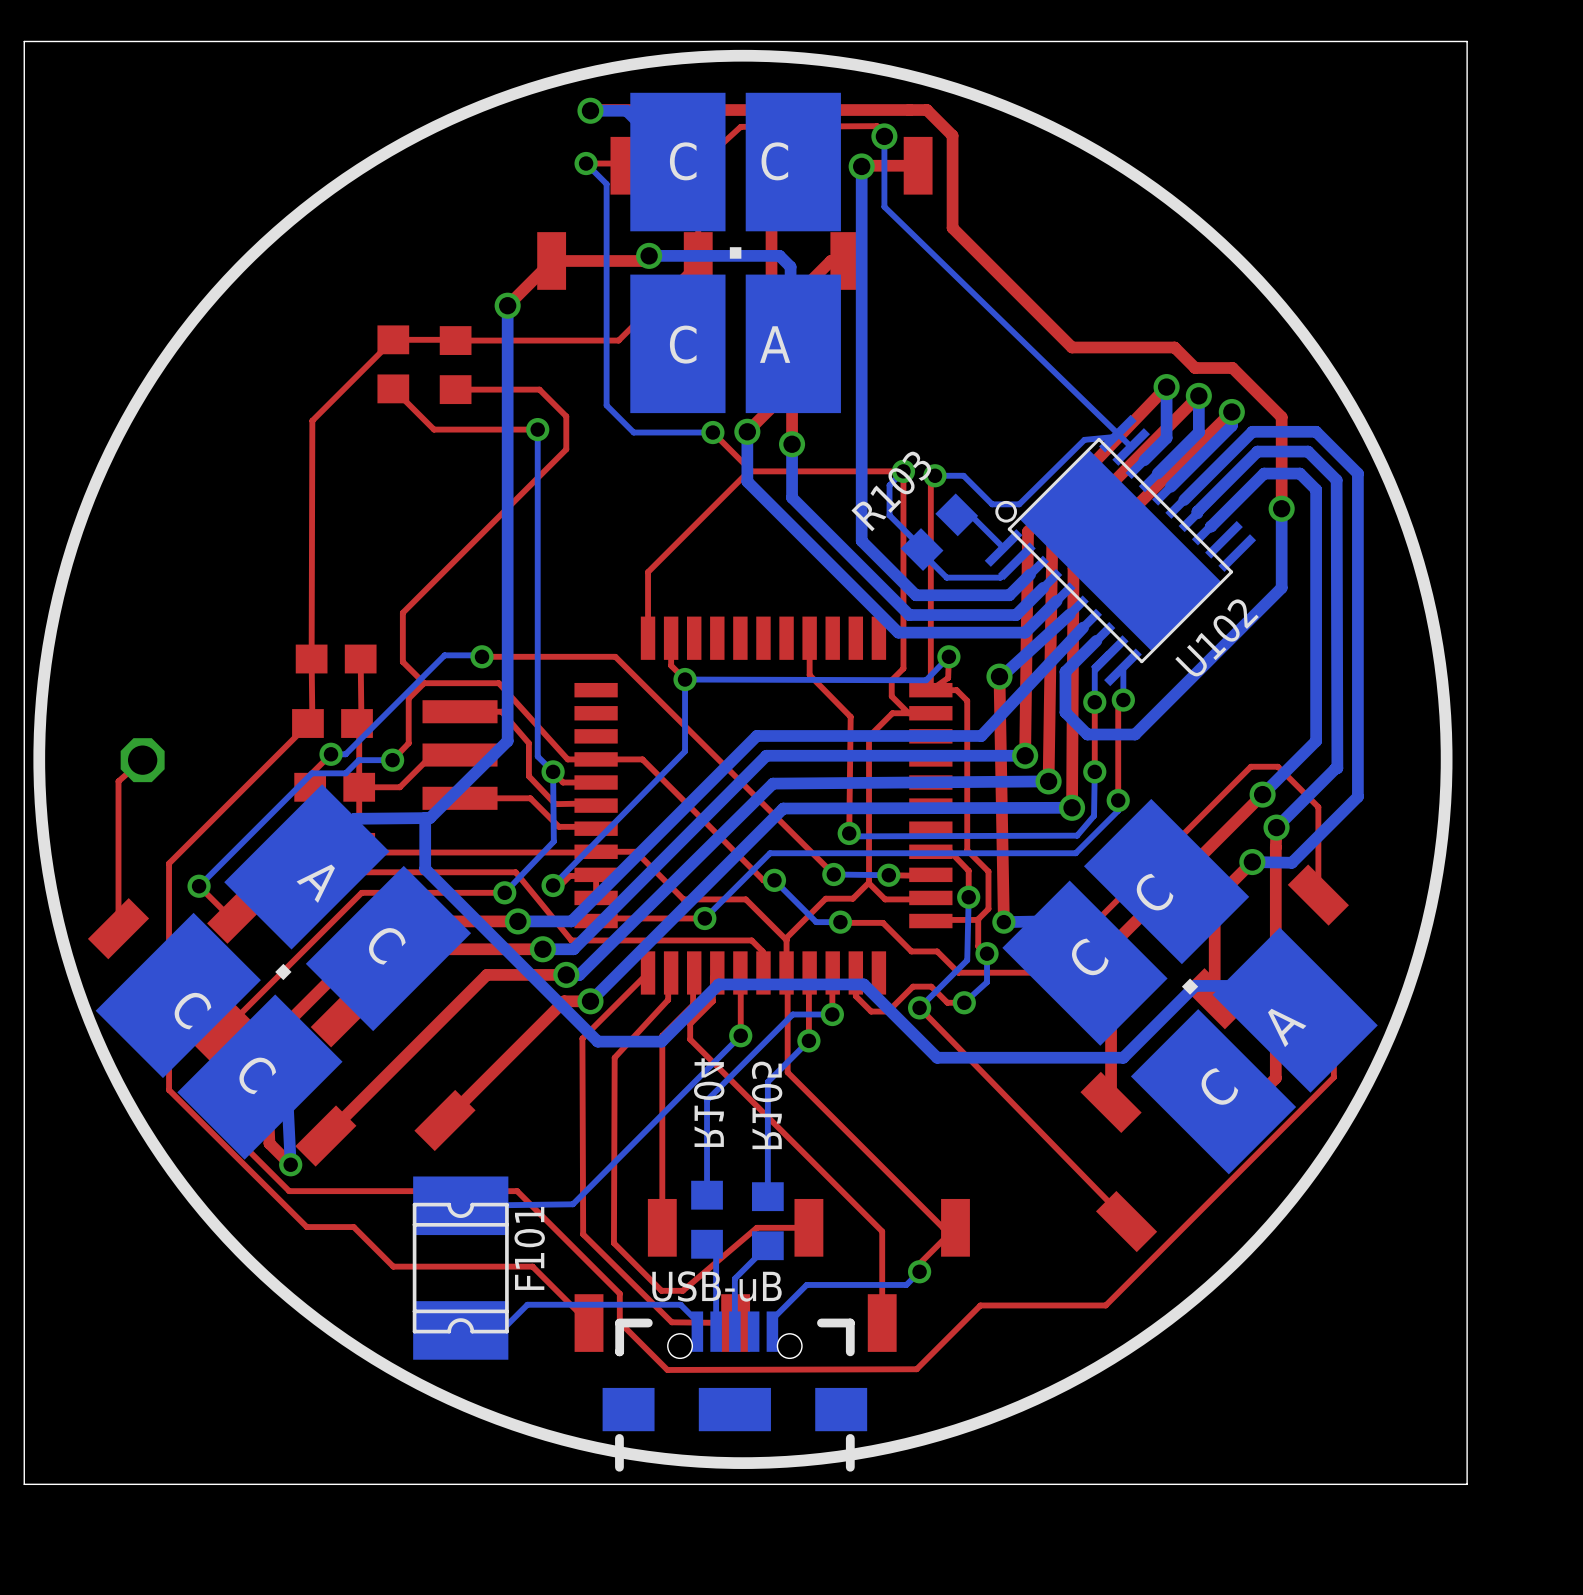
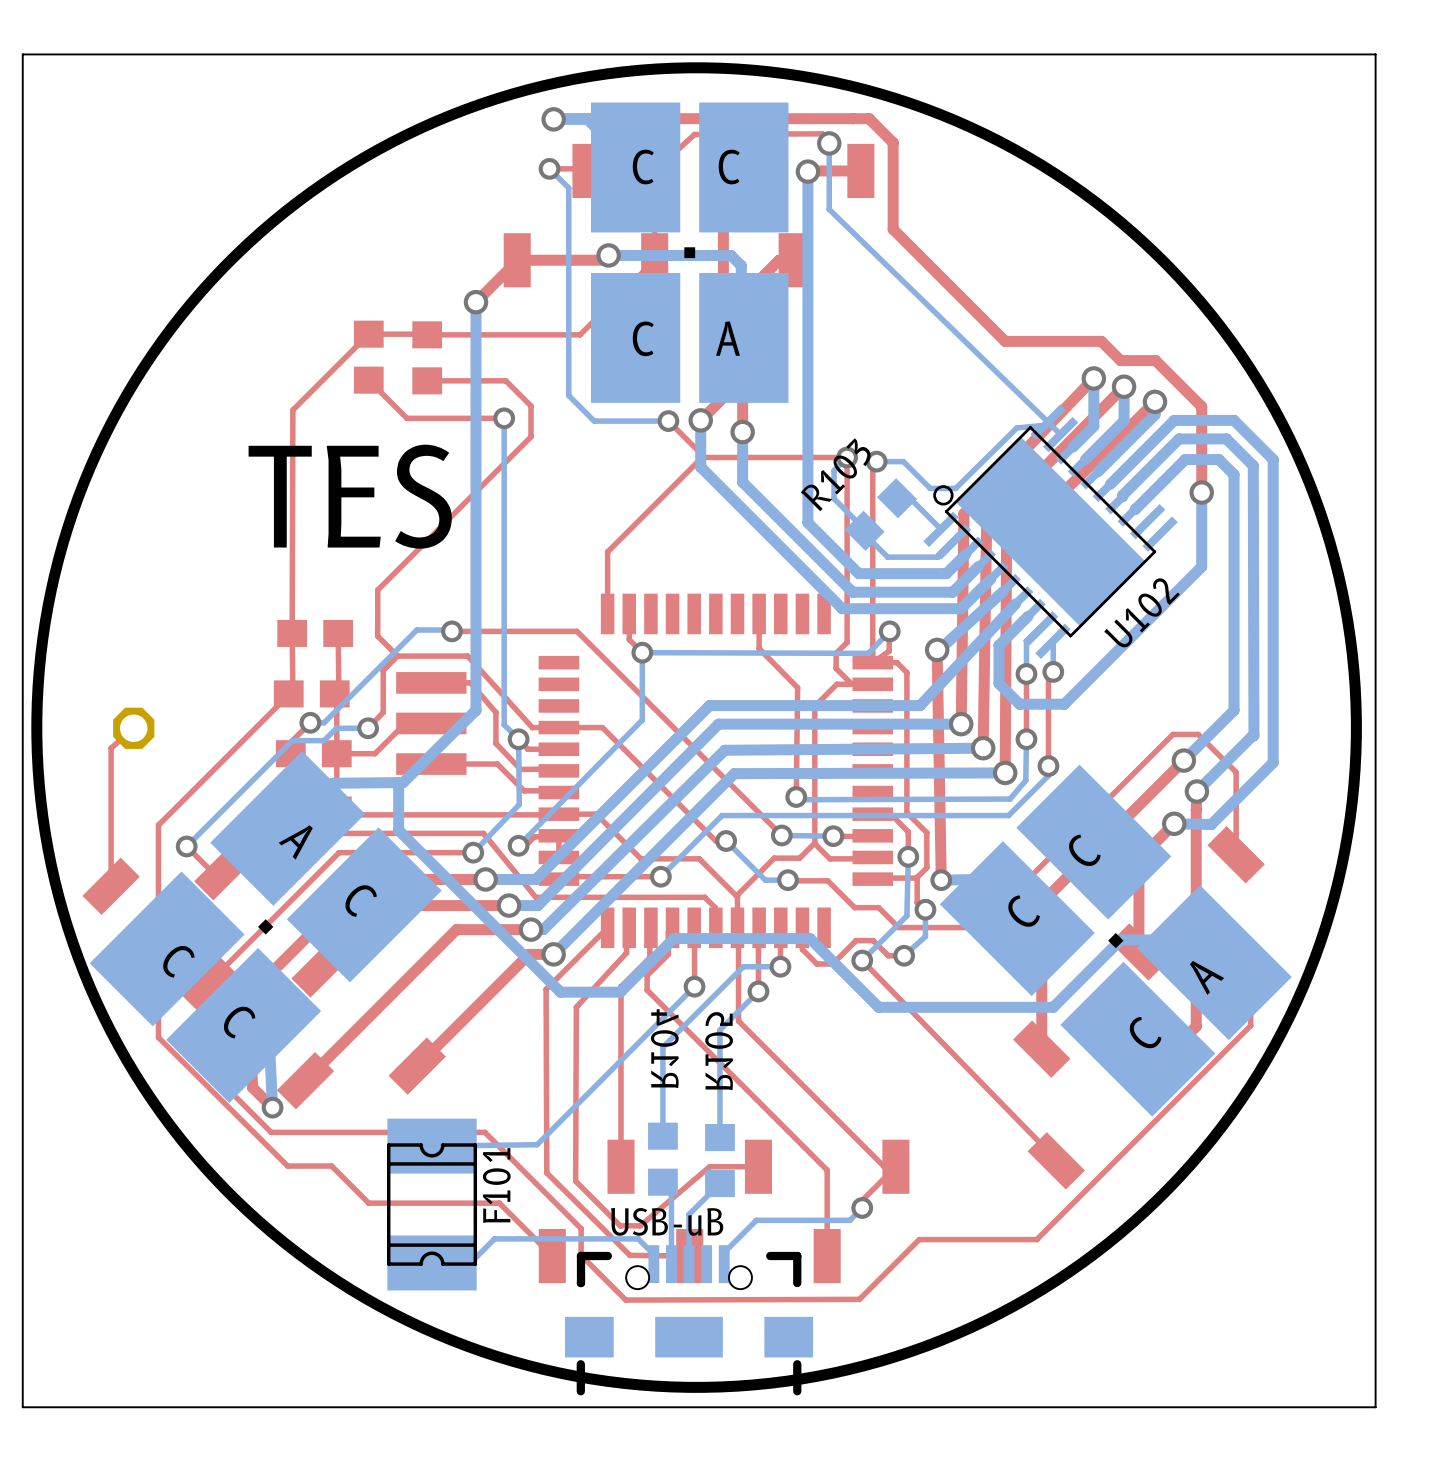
text: none -> TES (350, 496)

